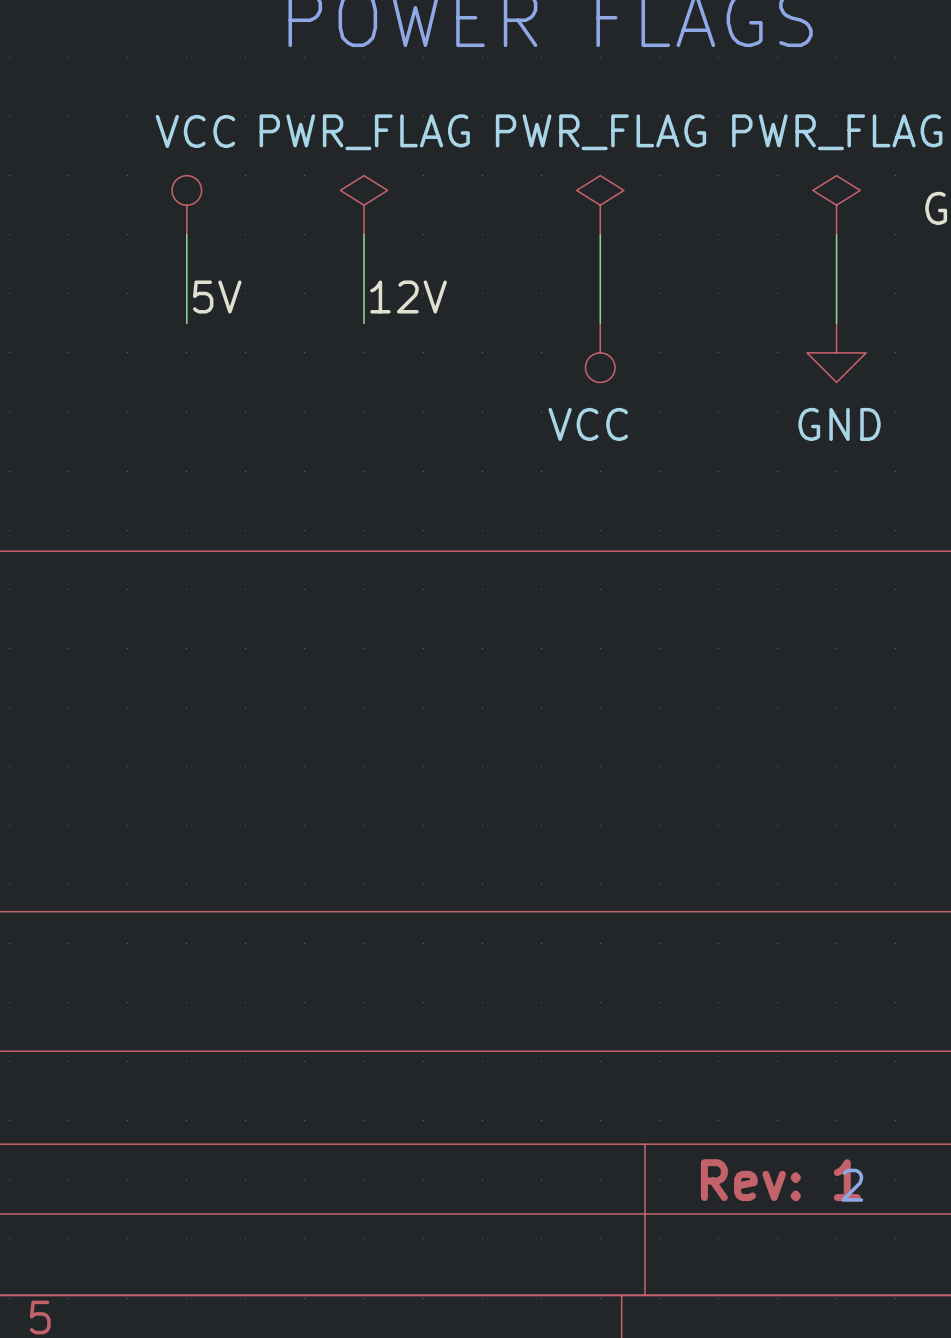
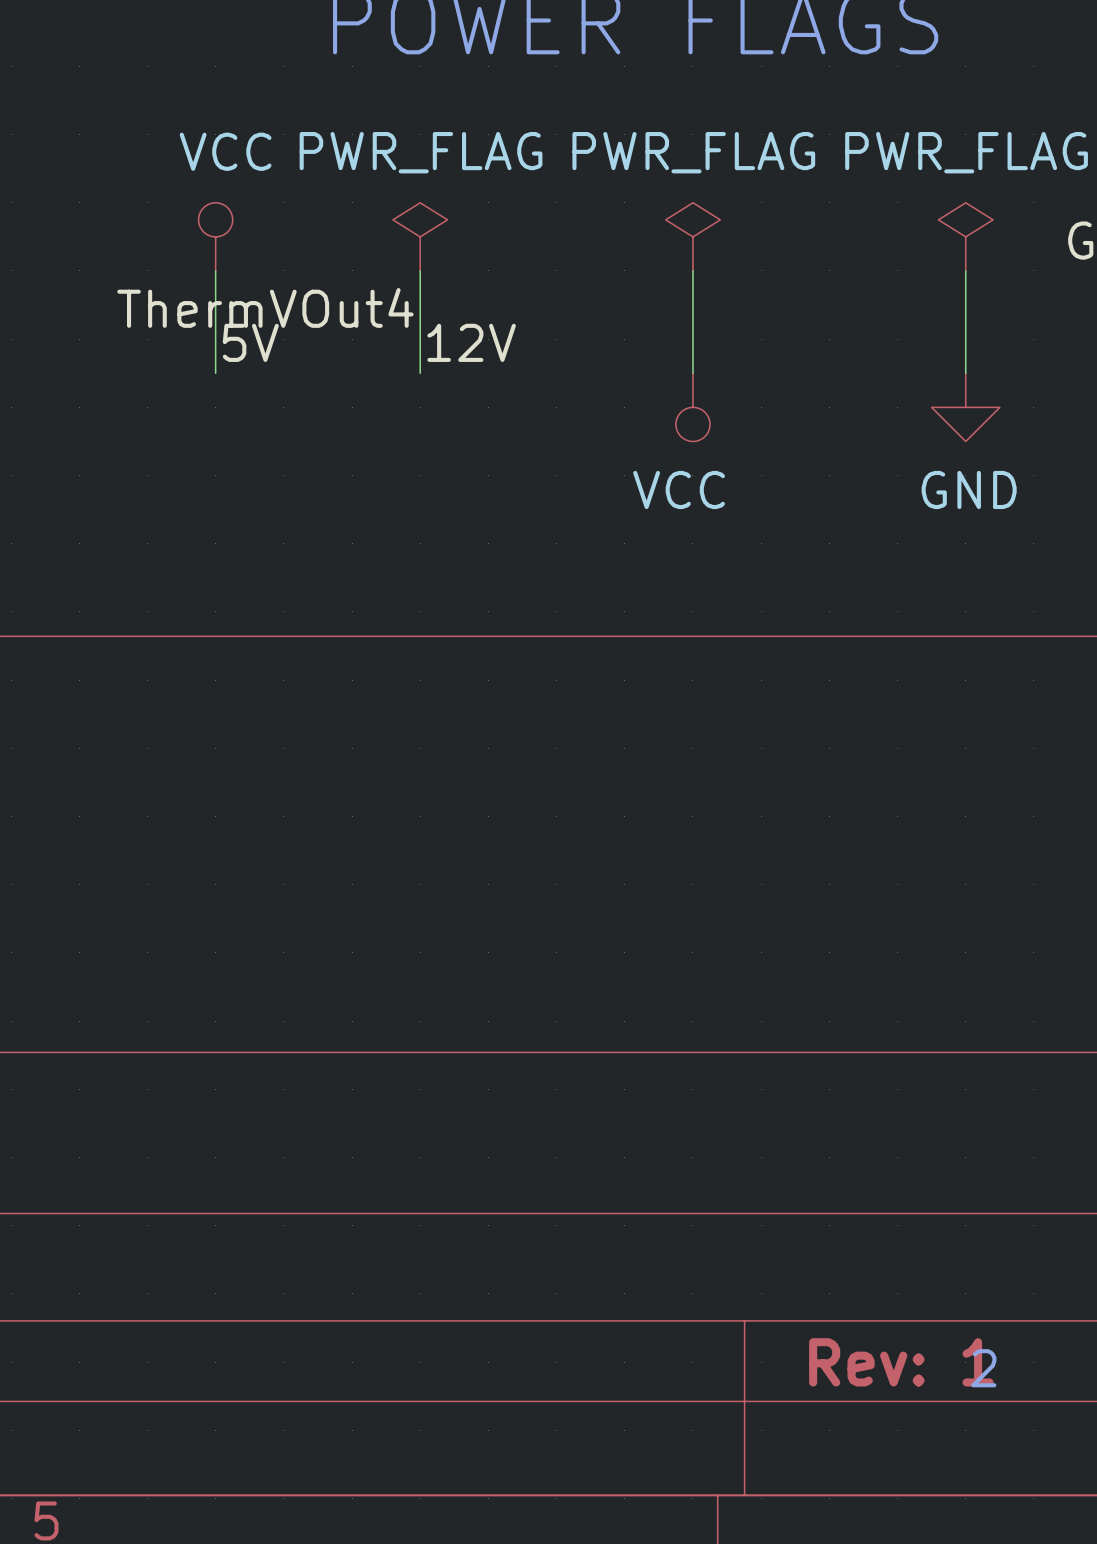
label: none -> ThermVOut4 (265, 307)

